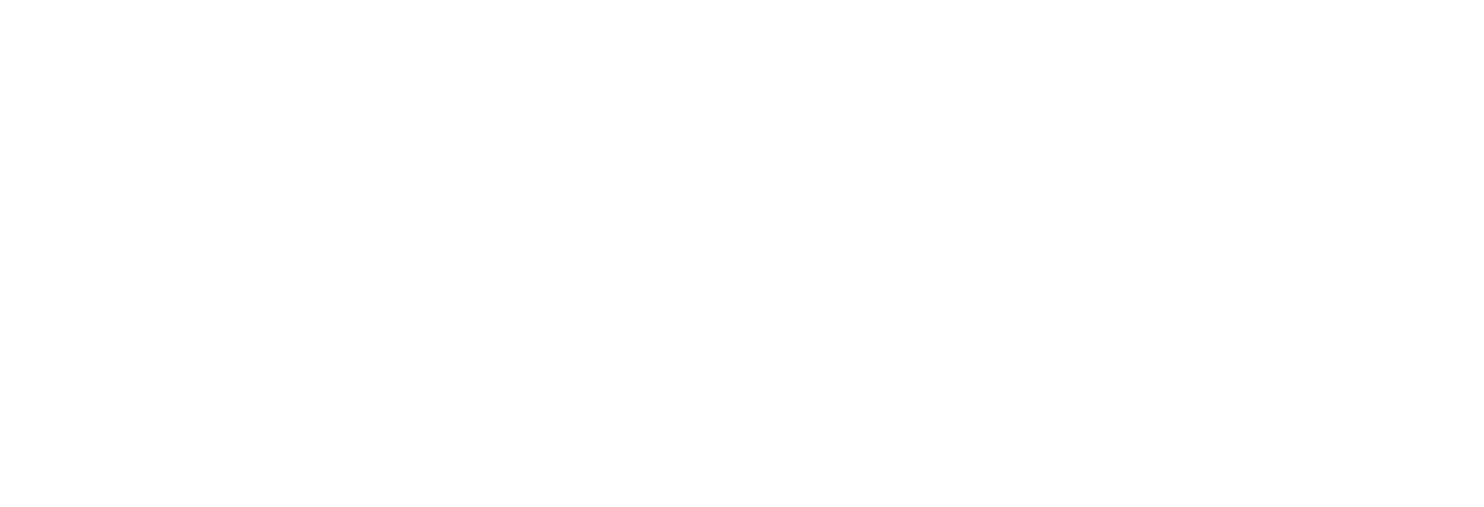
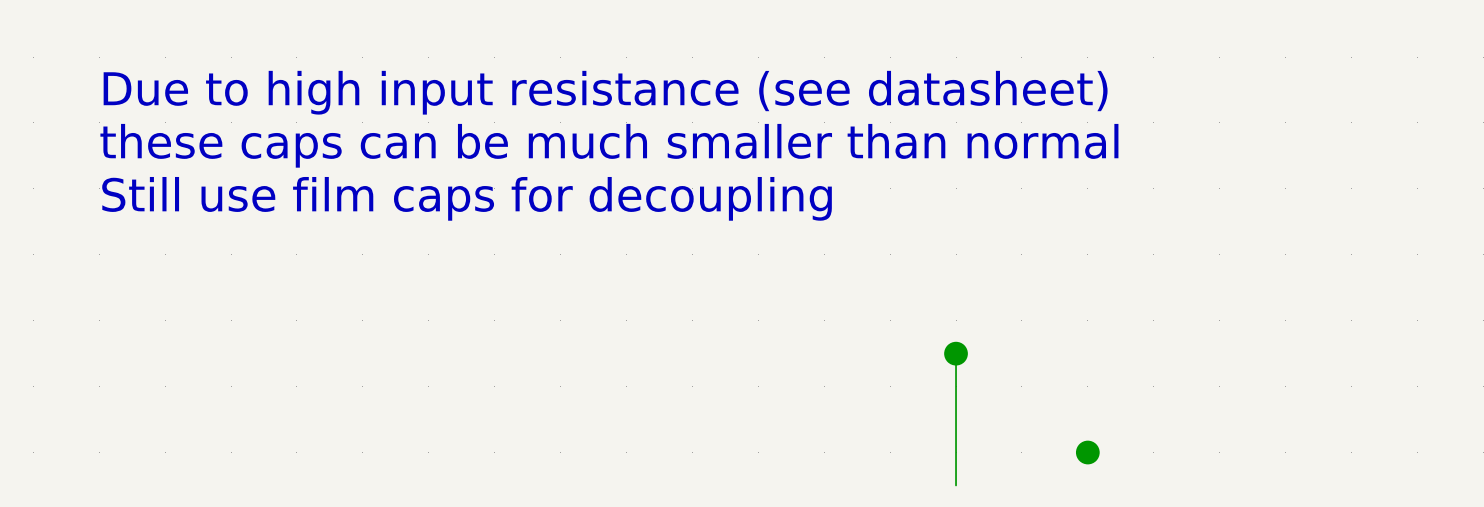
text: none -> Due to high input resistance (see datasheet) (605, 92)
text: none -> these caps can be much smaller than normal (609, 145)
text: none -> Still use film caps for decoupling (467, 198)
wire: none -> (956, 353) (956, 485)
junction: none -> (956, 353)
junction: none -> (1087, 452)

